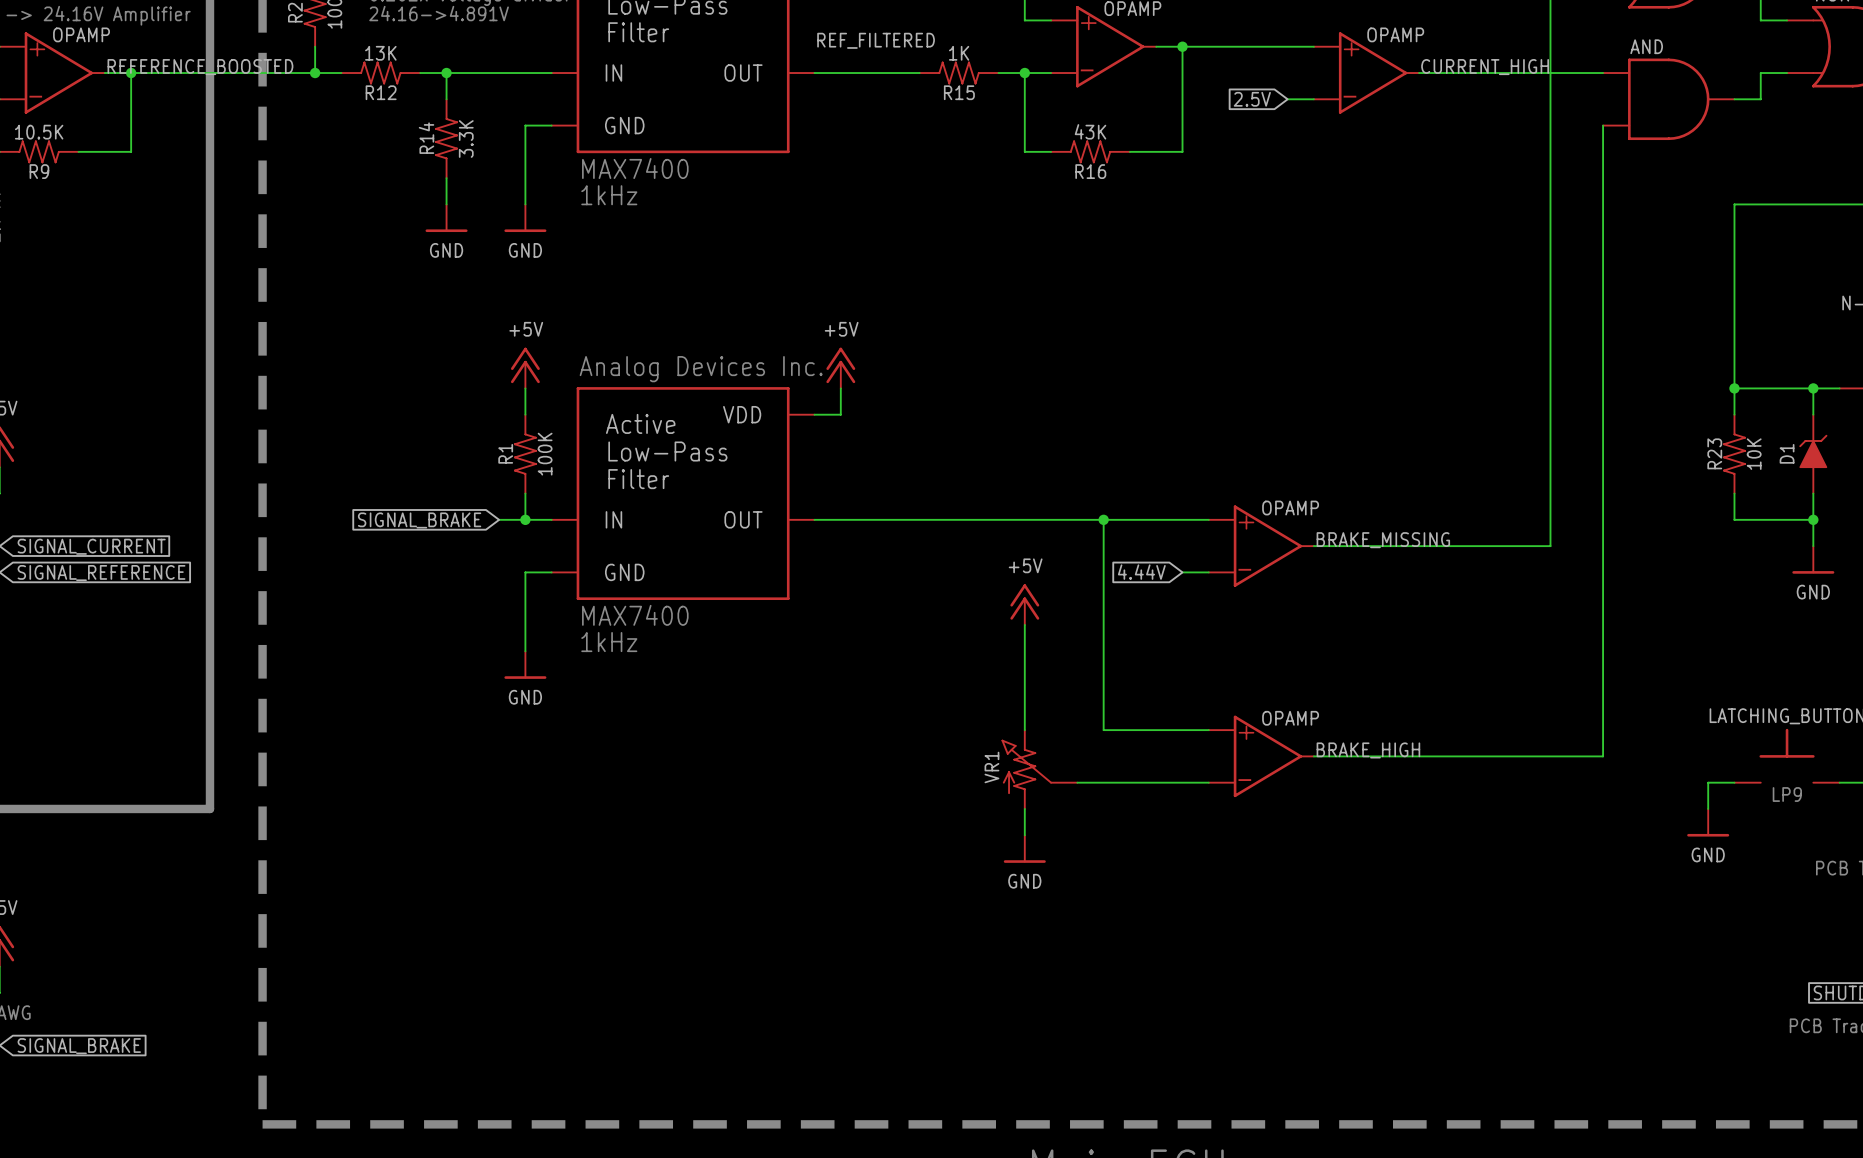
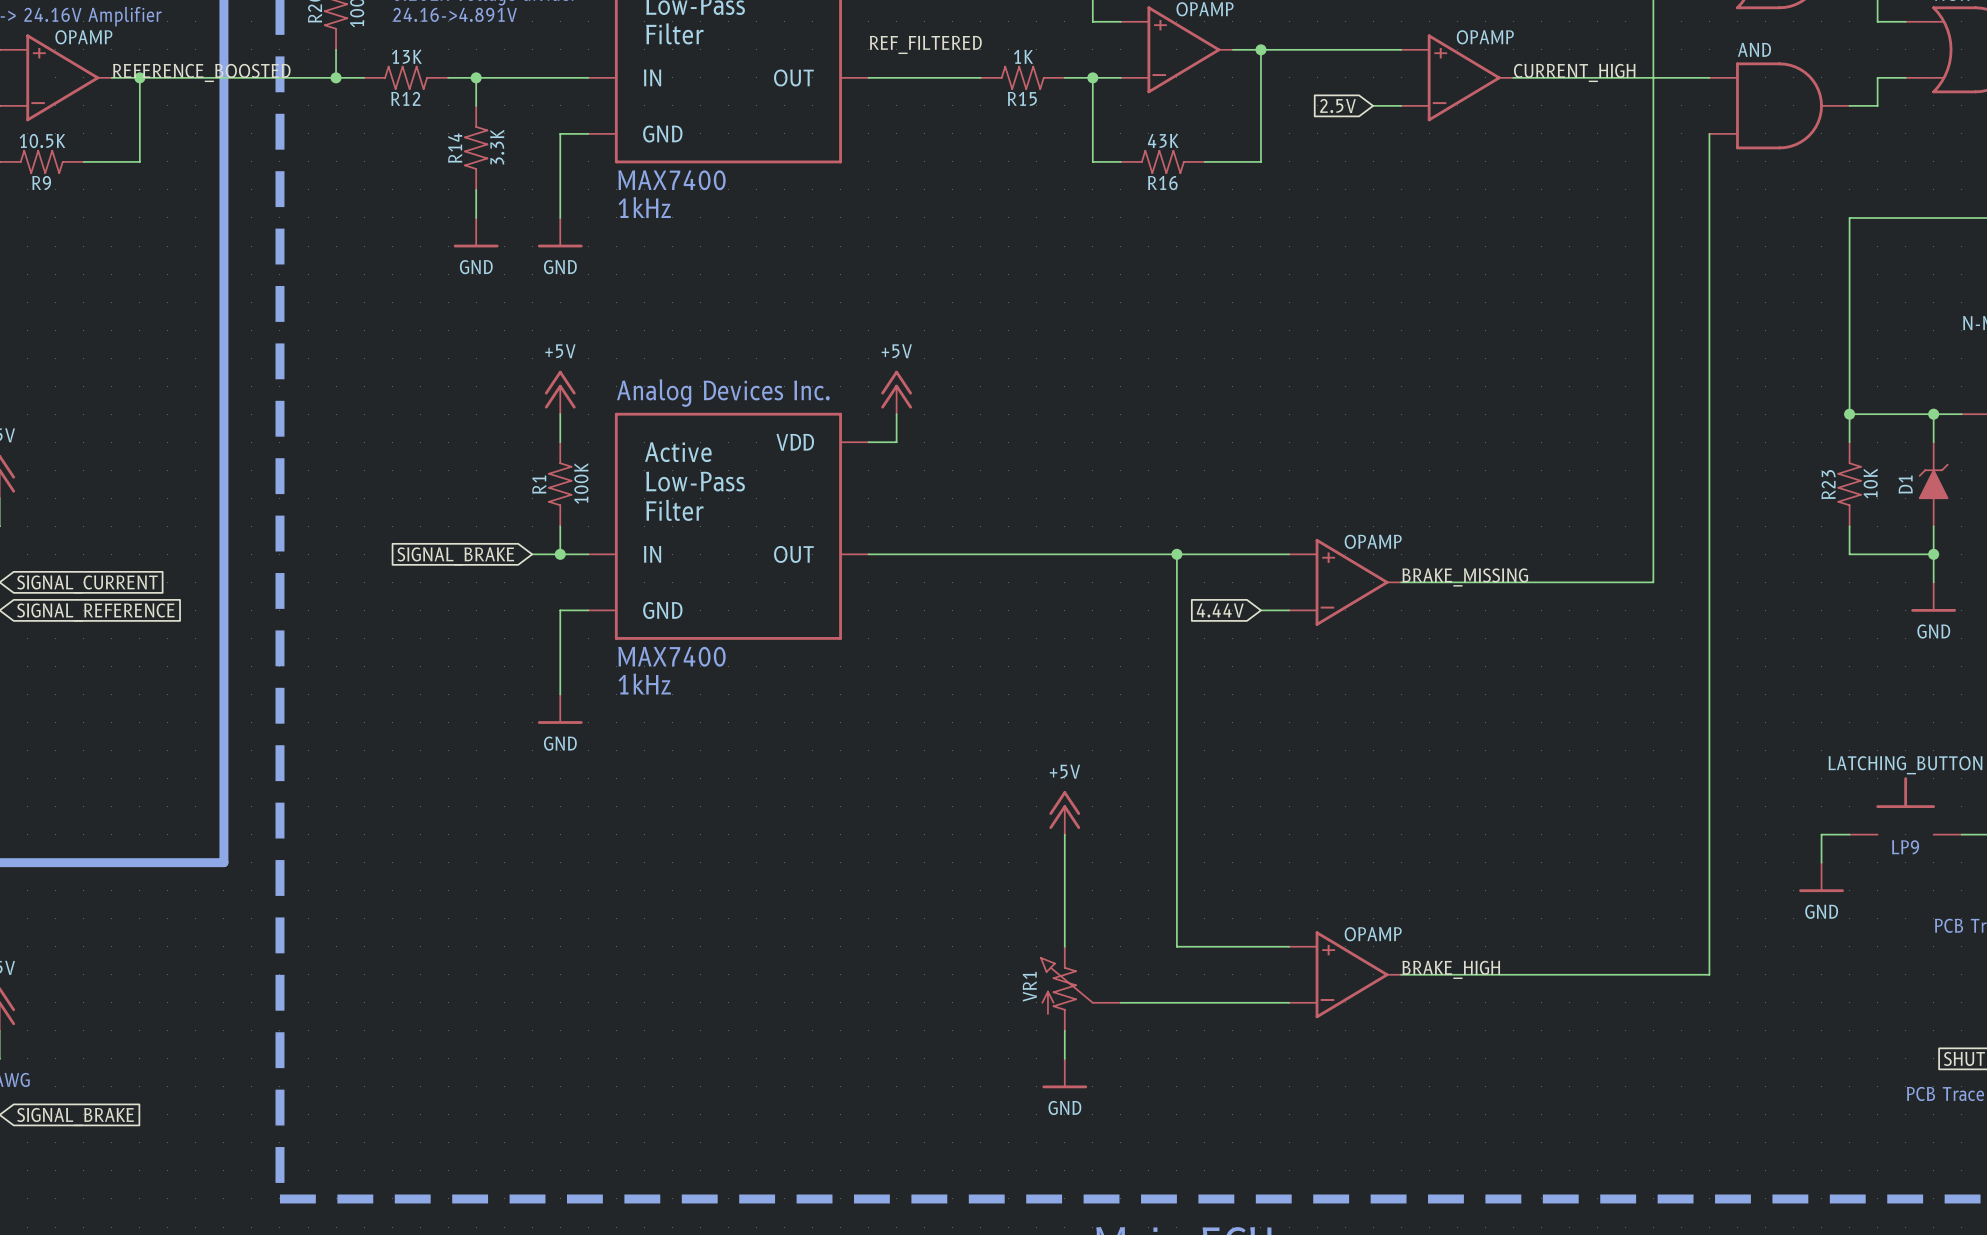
power symbol position: +5V (1024, 604) -> +5V (1064, 812)
wire: (1024, 624) (1024, 730) -> (1064, 834) (1064, 946)
wire: (1103, 730) (1208, 730) -> (1176, 778) (1176, 946) (1289, 946)
label position: BRAKE_HIGH (1368, 750) -> BRAKE_HIGH (1451, 969)
part position: (1261, 756) -> (1345, 974)
wire: (1313, 756) (1603, 756) -> (1401, 974) (1709, 974) (1709, 806)
VR1 position: (1039, 769) -> (1080, 988)
wire: (1077, 782) (1208, 782) -> none
wire: (1024, 808) (1024, 835) -> (1064, 1030) (1064, 1058)
power symbol position: GND (1024, 849) -> GND (1064, 1073)
wire: none -> (1120, 1002) (1289, 1002)

